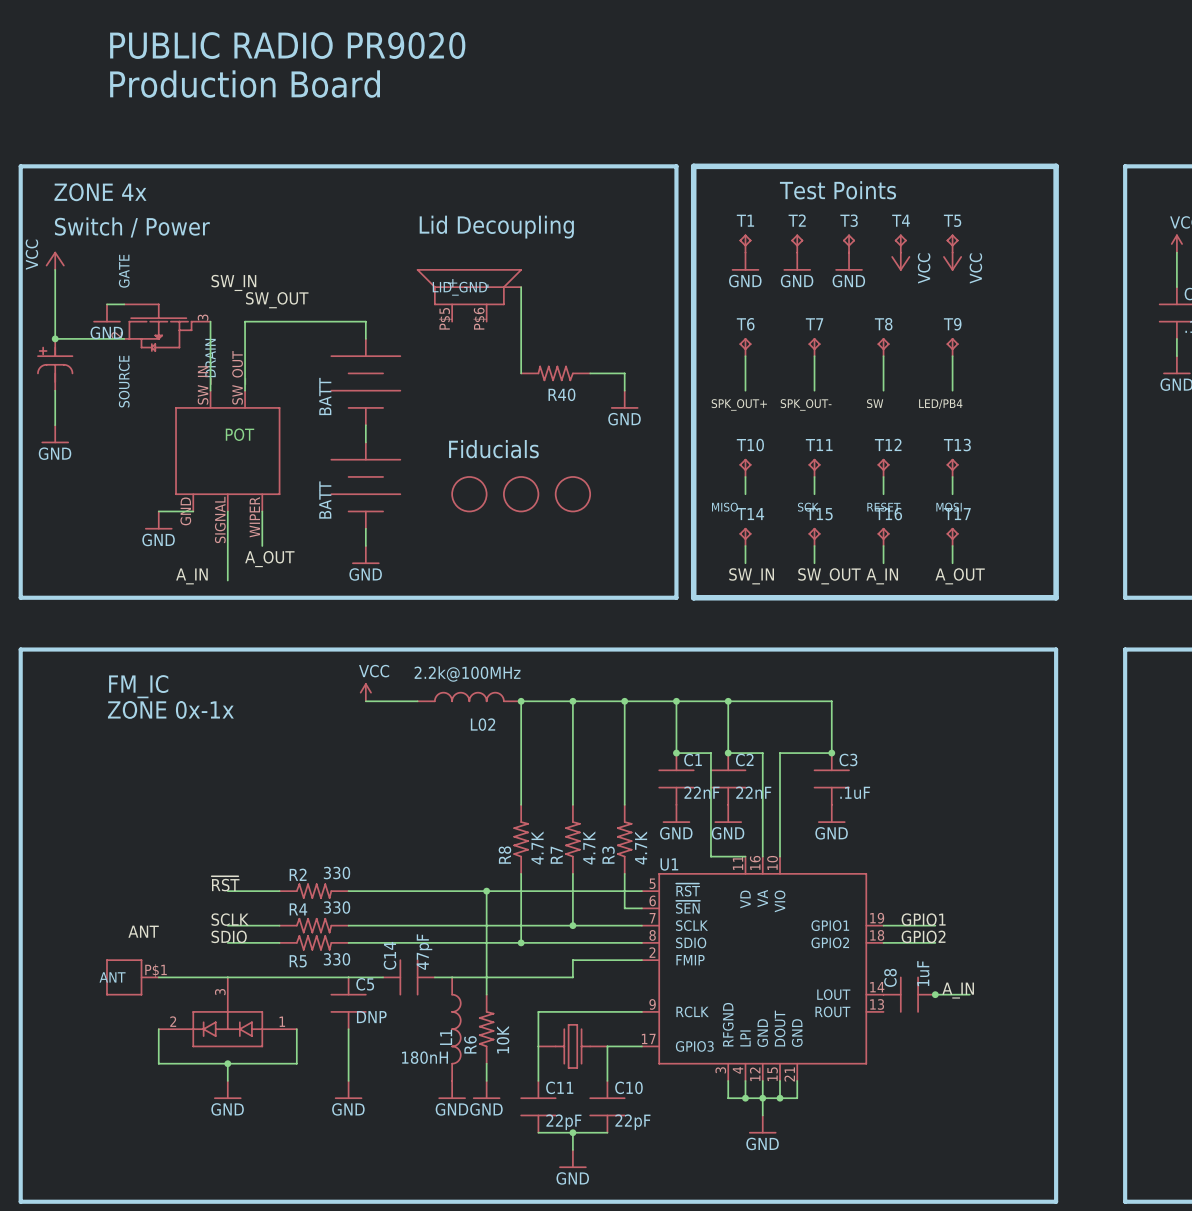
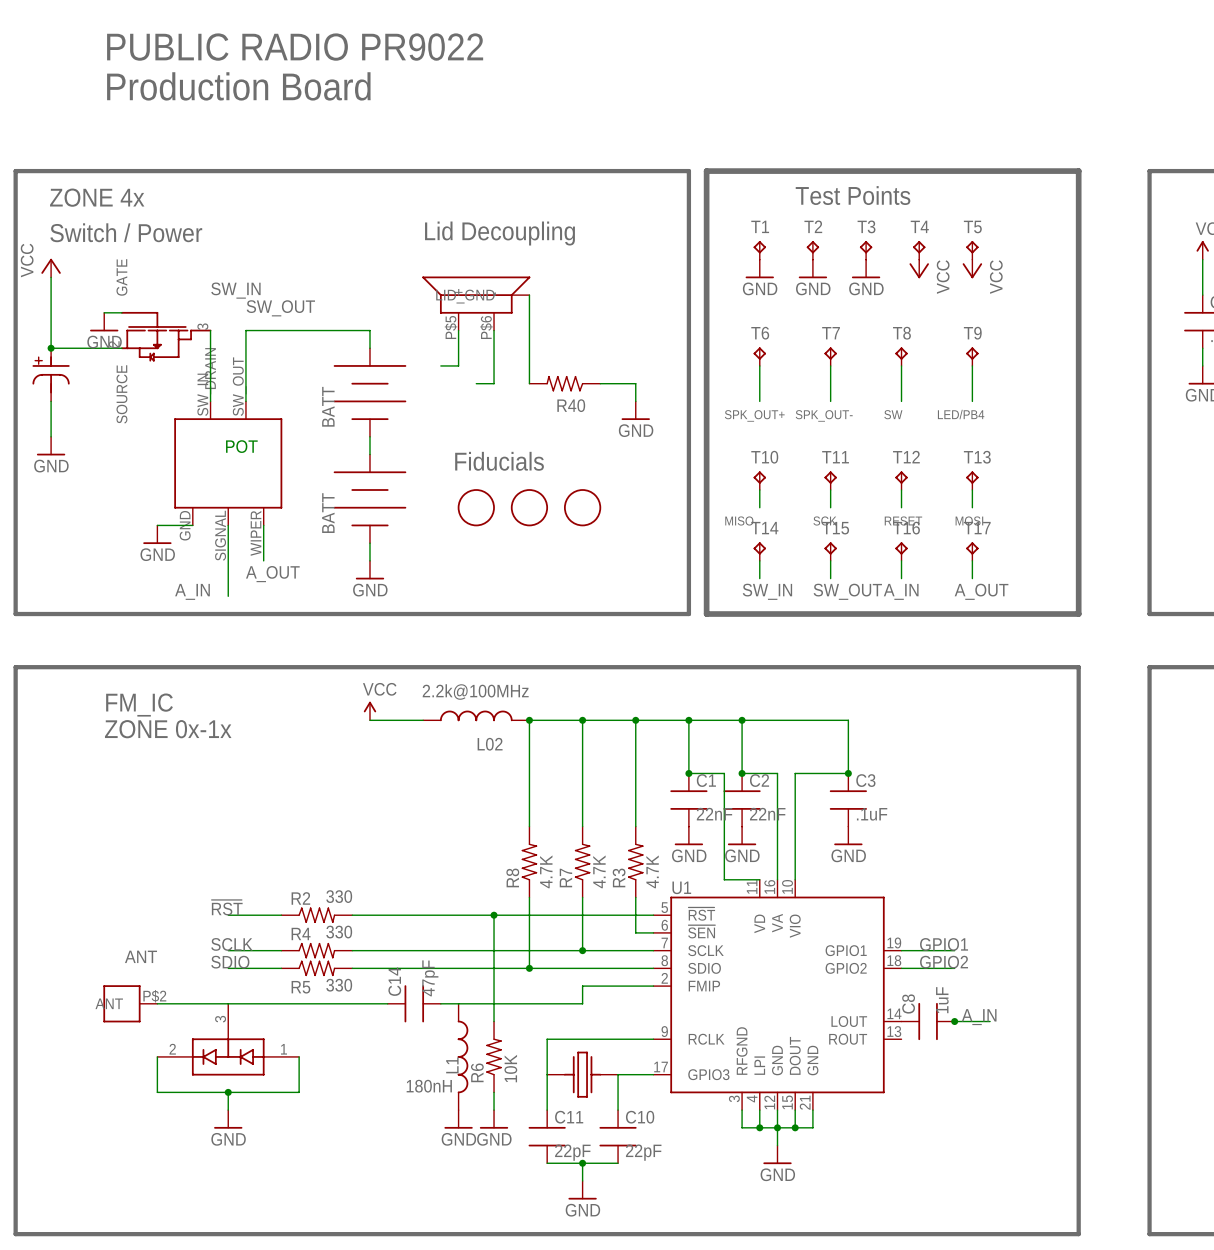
text: PUBLIC RADIO PR9020 (287, 45) -> PUBLIC RADIO PR9022 (295, 47)
wire: none -> (458, 330) (458, 365) (440, 365)
wire: none -> (494, 330) (494, 383) (476, 383)
part pin number: P$1 (156, 970) -> P$2 (154, 996)
C5: DNP (348, 1003) -> none
wire: (348, 1029) (348, 1080) -> none
power symbol: GND (348, 1090) -> none

